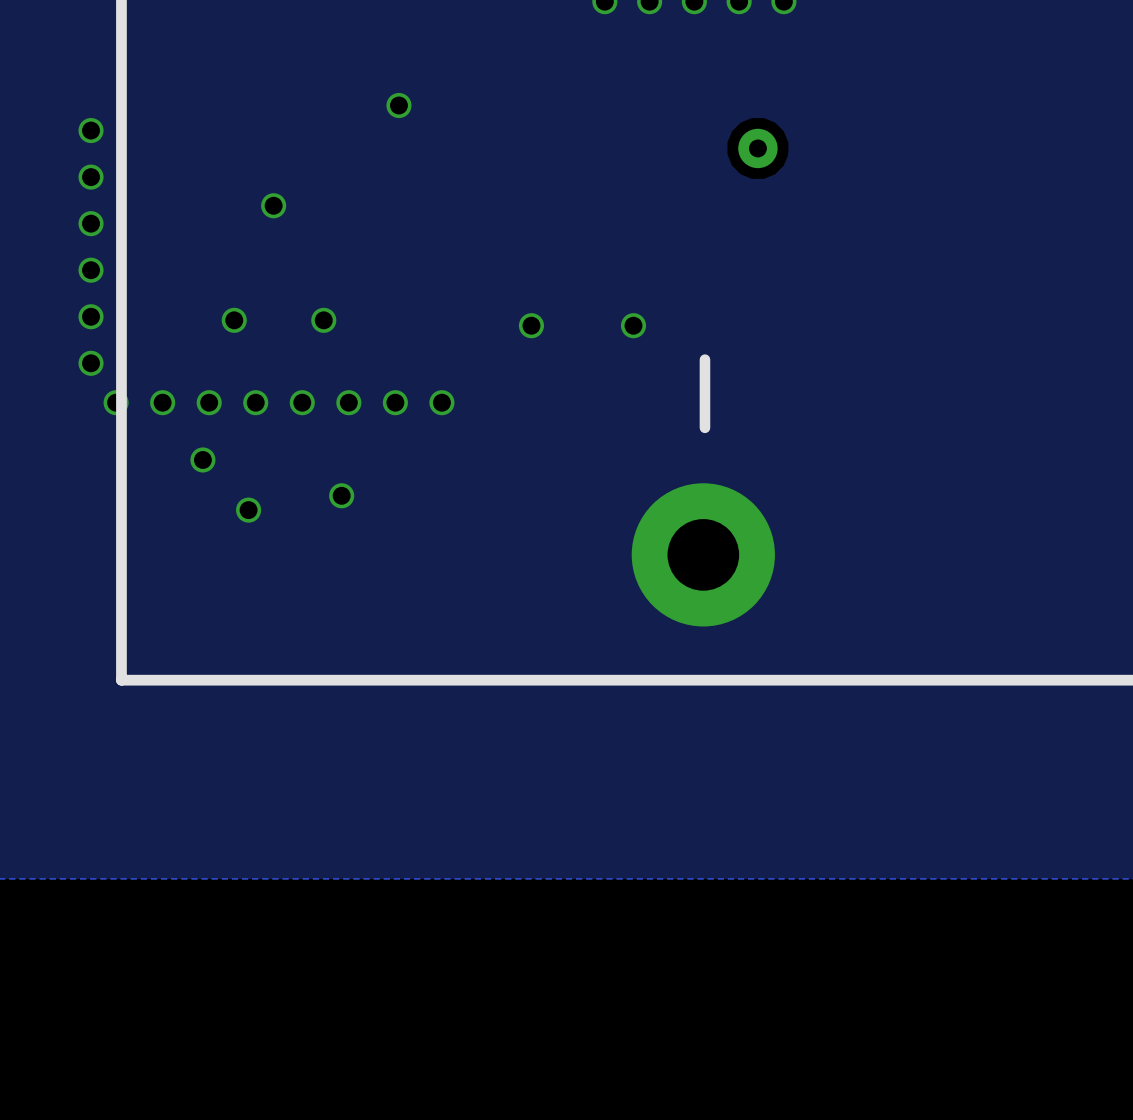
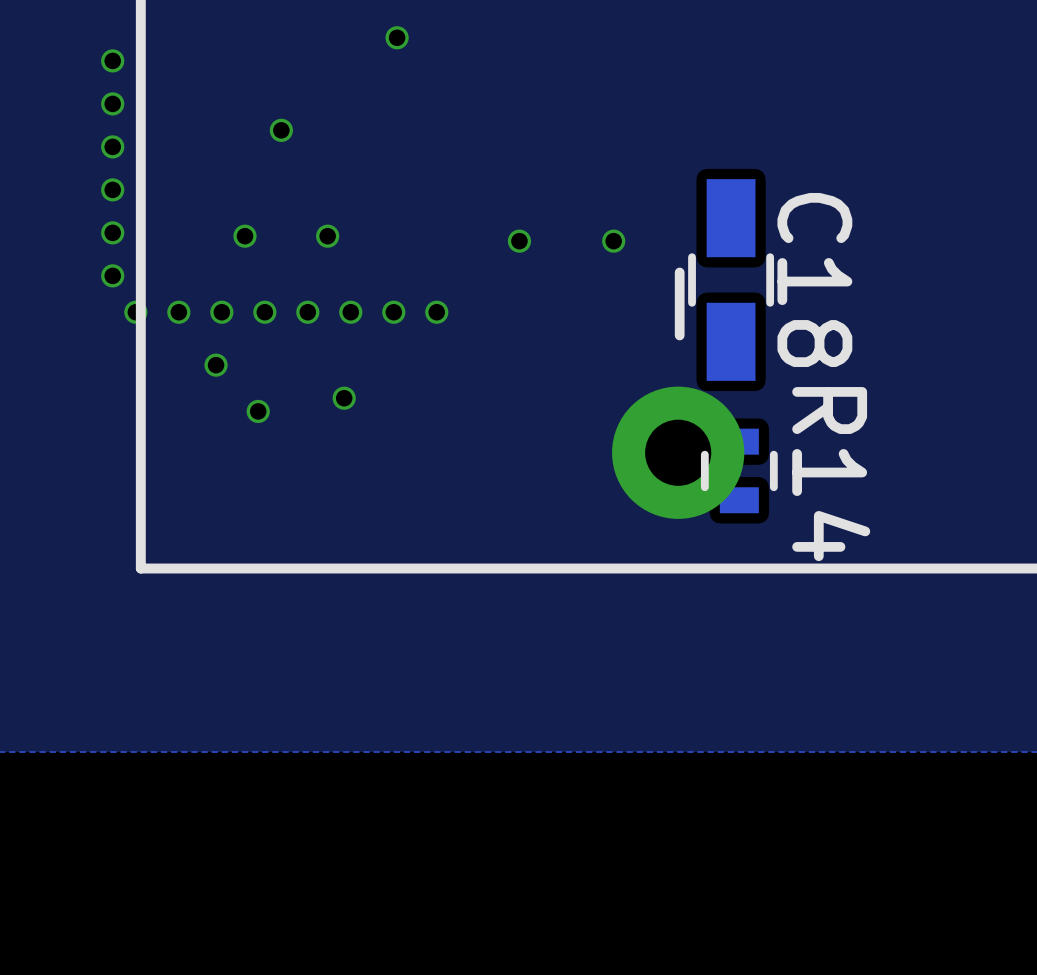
via: (757, 148) -> none
C18: none -> (731, 279)
R14: none -> (739, 470)

